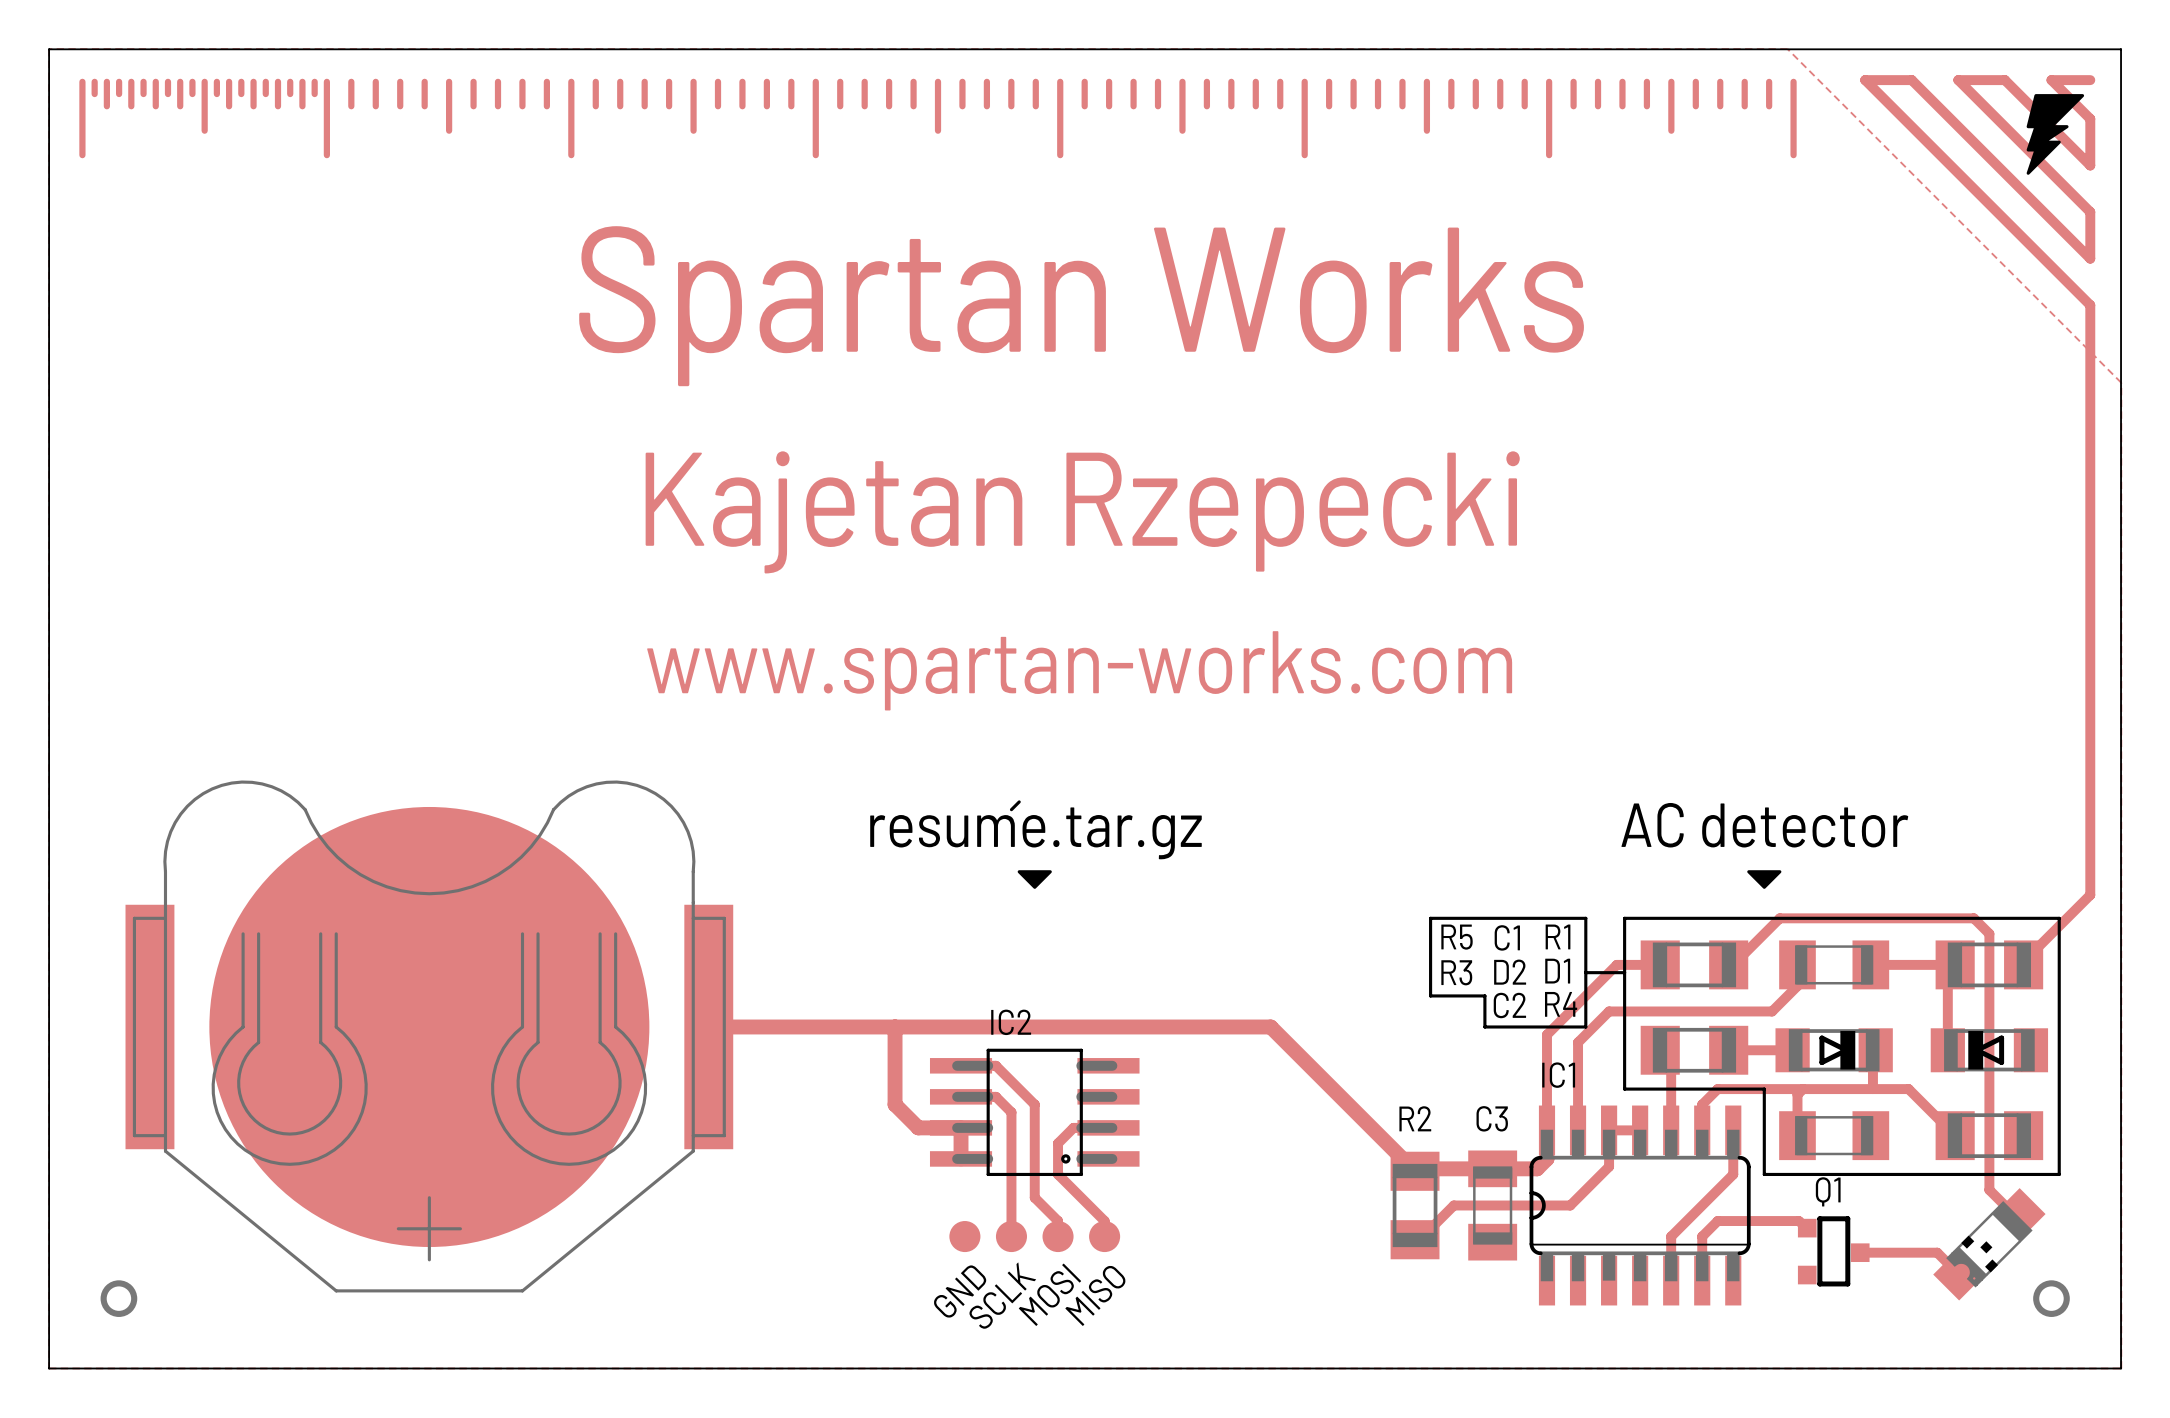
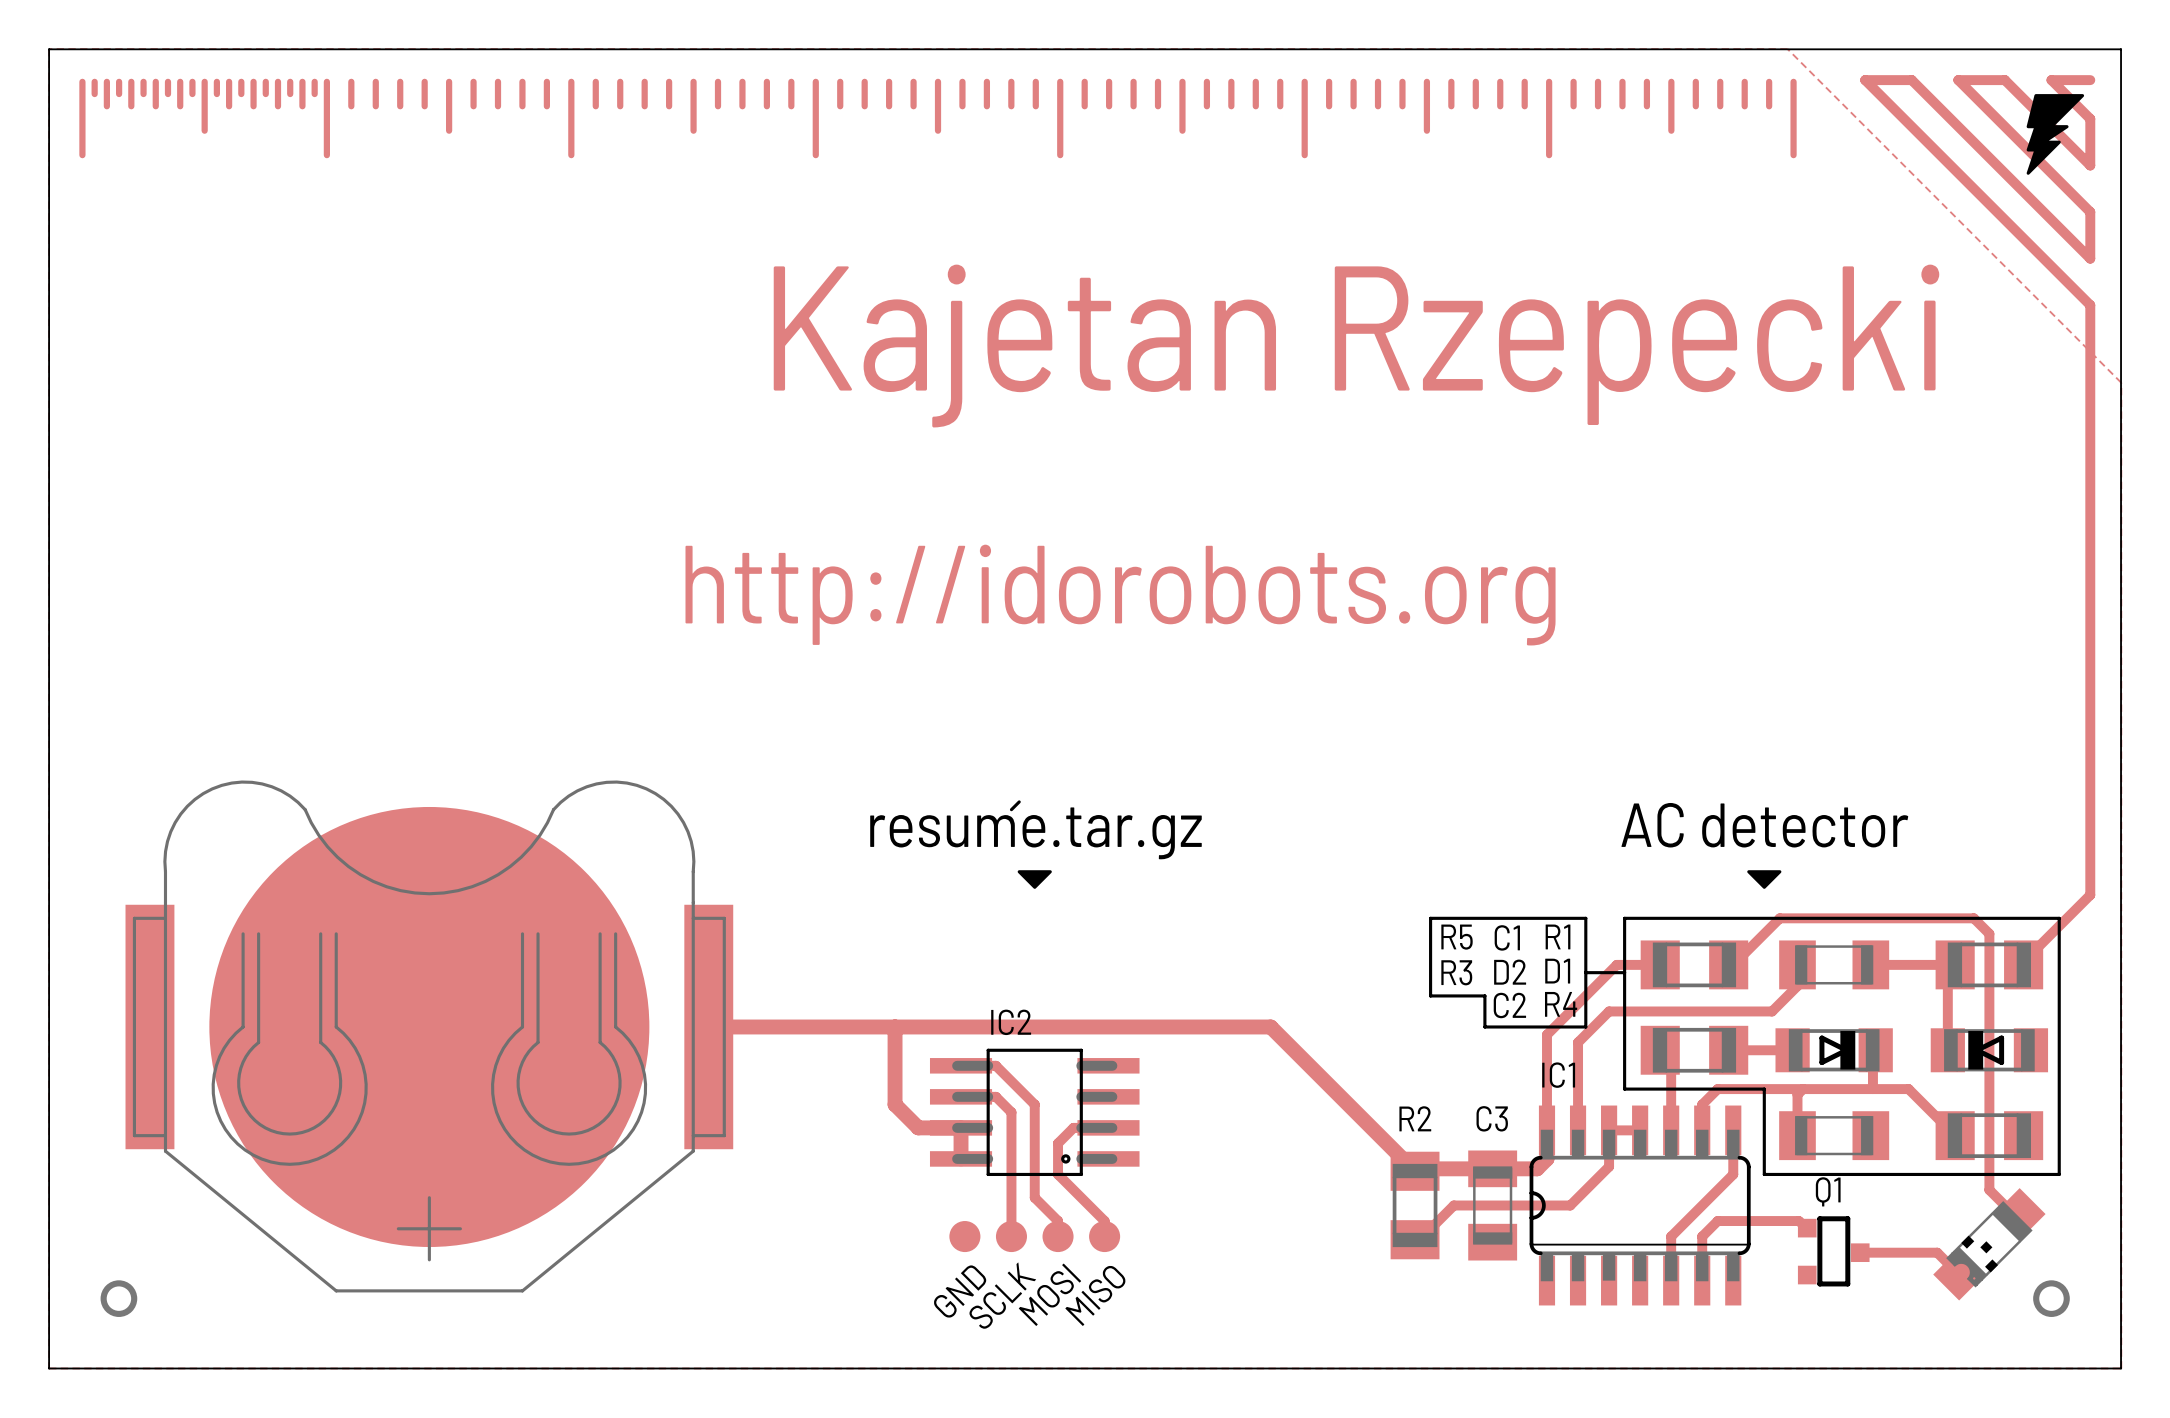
text: Spartan Works (1081, 306) -> none
text: none -> Kajetan Rzepecki (1356, 346)
text: Kajetan Rzepecki (1082, 512) -> none
text: none -> http://idorobots.org (1120, 595)
text: www.spartan-works.com (1079, 670) -> none

